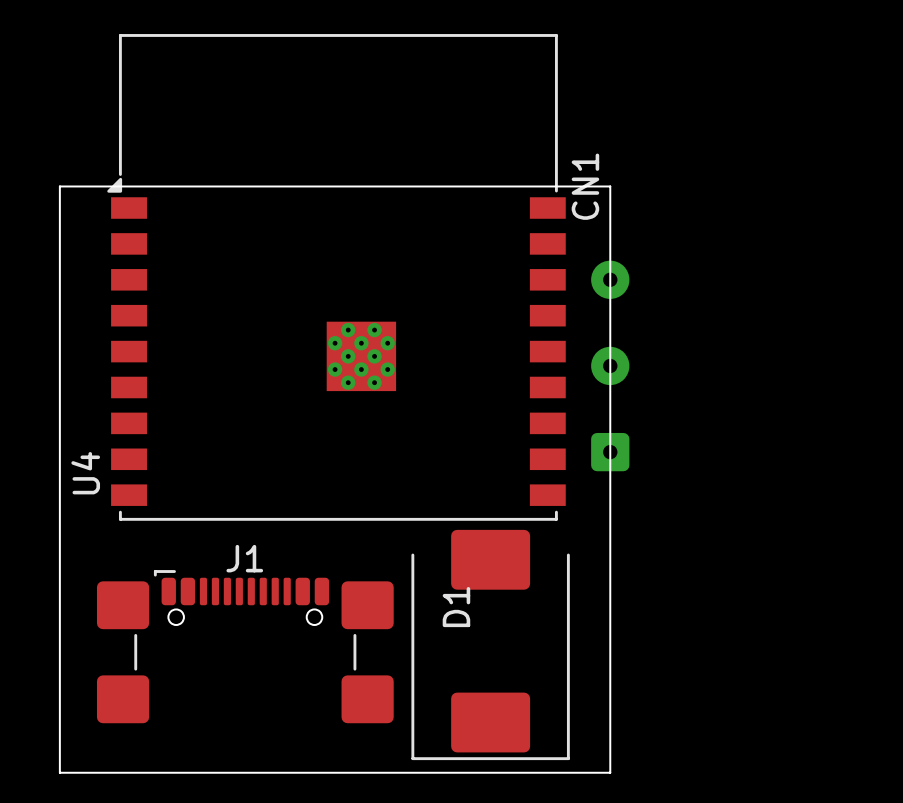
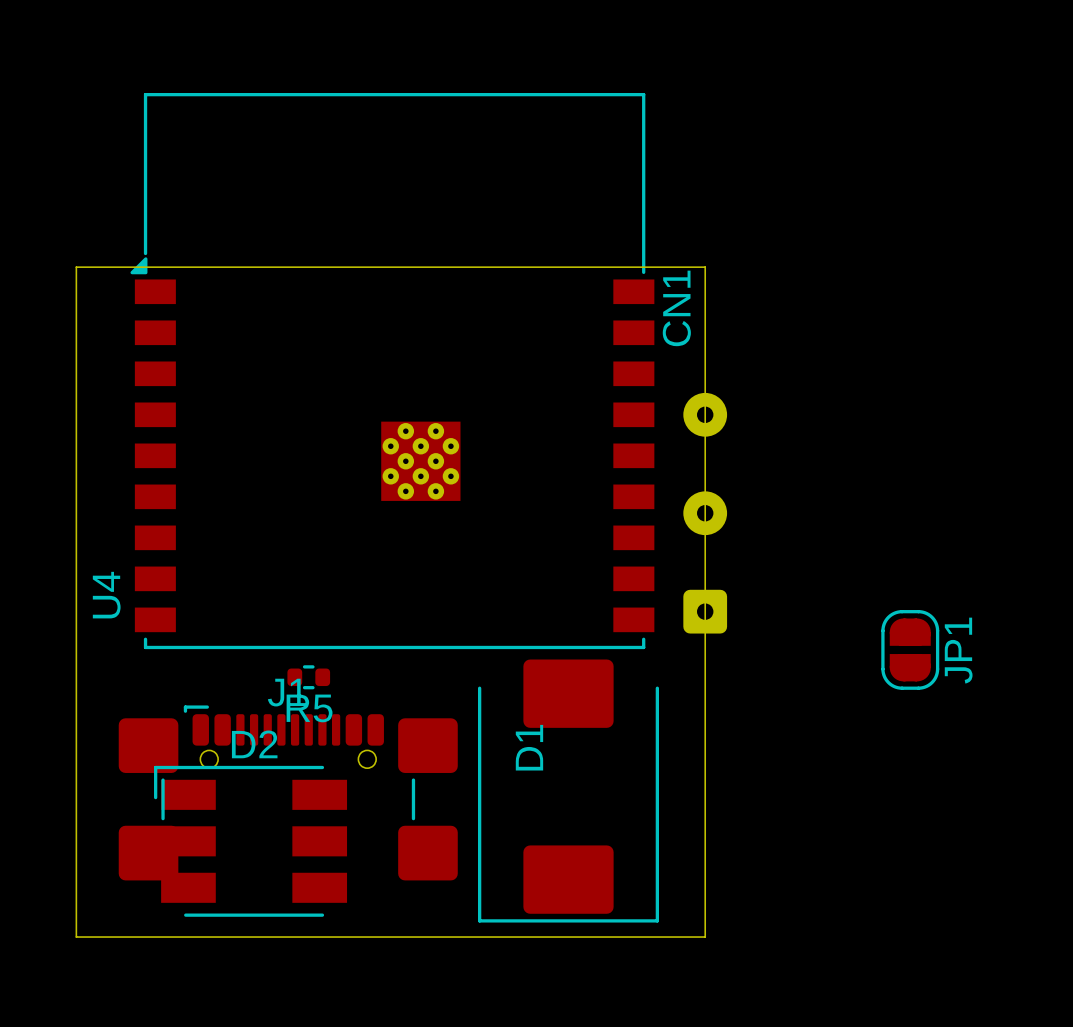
CN1 position: (610, 365) -> (705, 513)
JP1: none -> (910, 649)
R5: none -> (308, 677)
D2: none -> (250, 841)

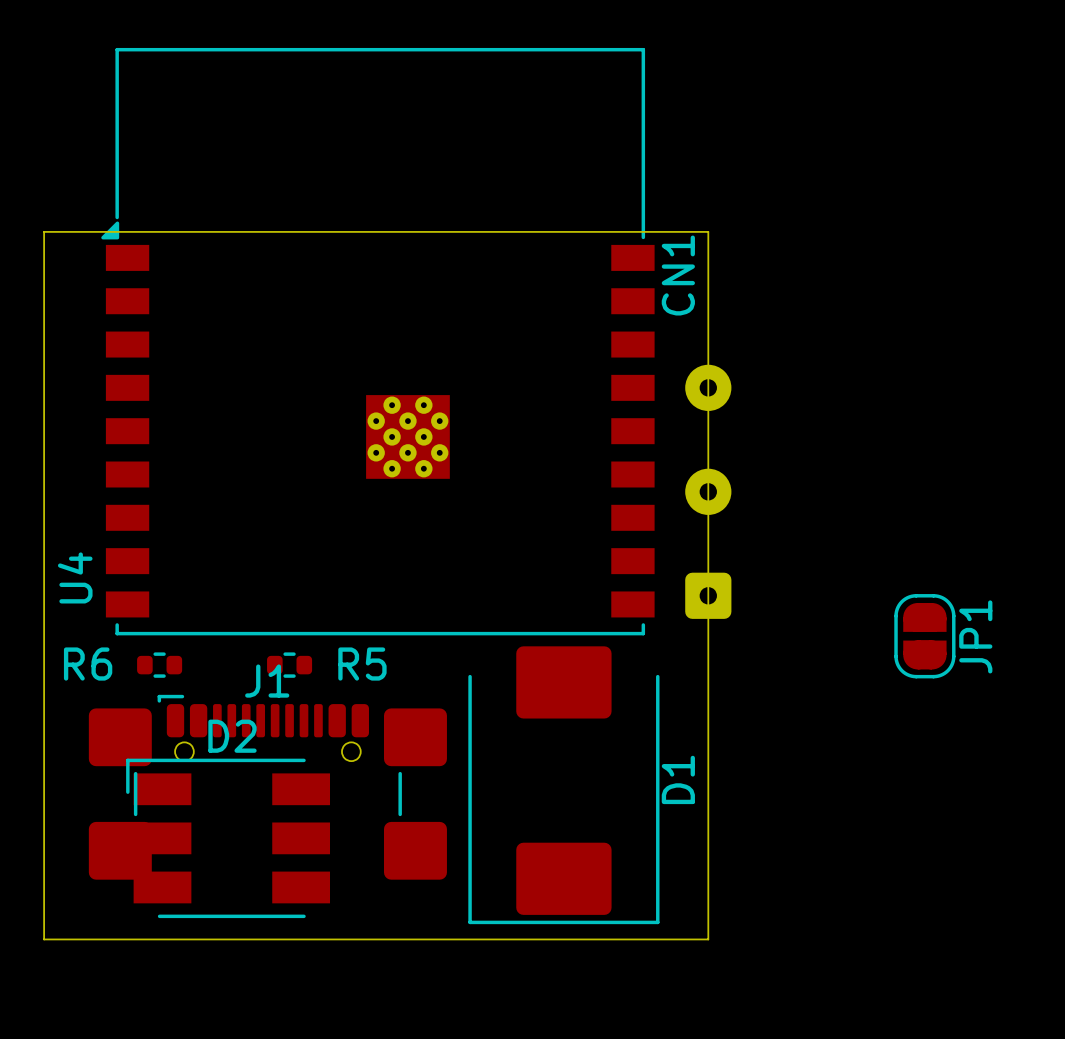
R6: none -> (159, 665)
R5 name position: R5 (309, 708) -> R5 (362, 664)
D1 name position: D1 (529, 747) -> D1 (678, 779)

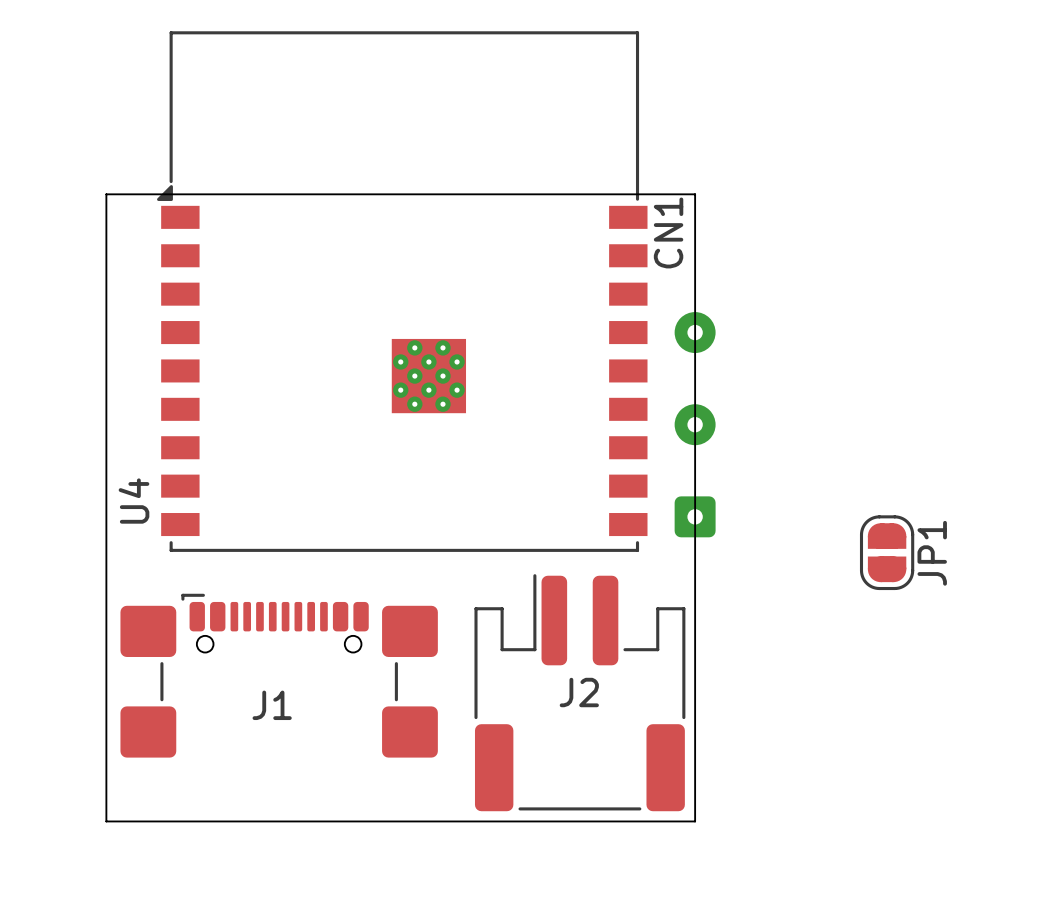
R6: (159, 665) -> none
R5: (289, 665) -> none
J1 name position: J1 (267, 681) -> J1 (272, 705)
D1: (563, 785) -> none
J1 position: (267, 787) -> (279, 675)
J2: none -> (579, 692)
D2: (228, 838) -> none

